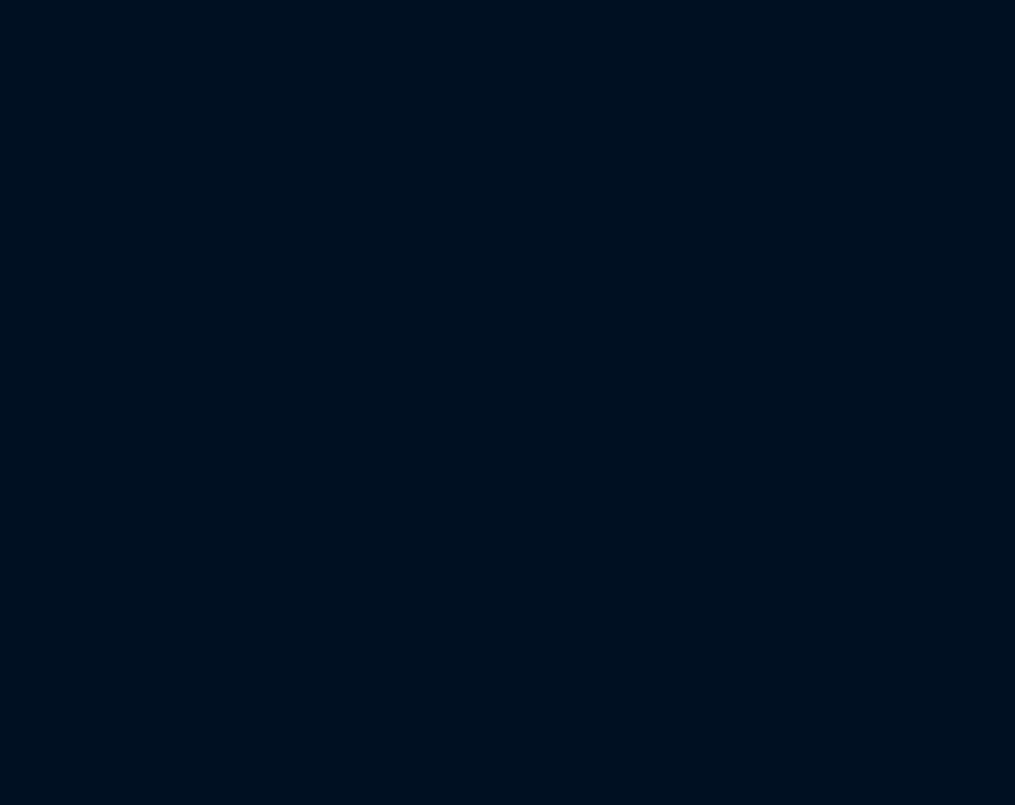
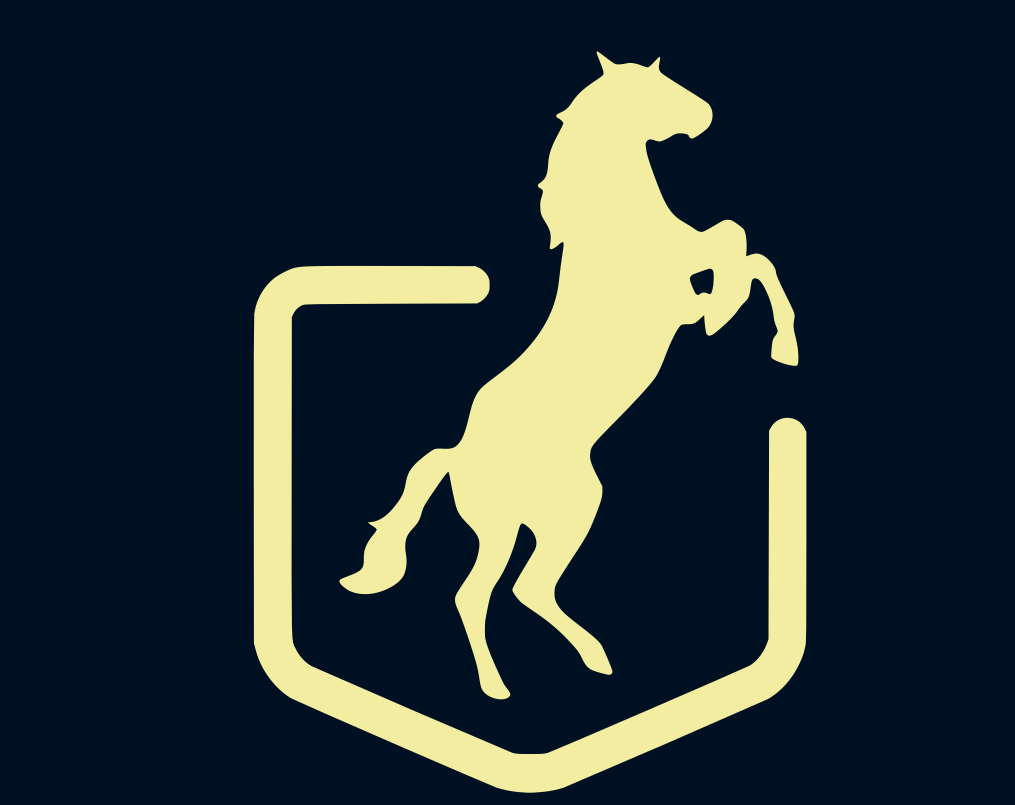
drawing: none -> [253, 51, 807, 793]

